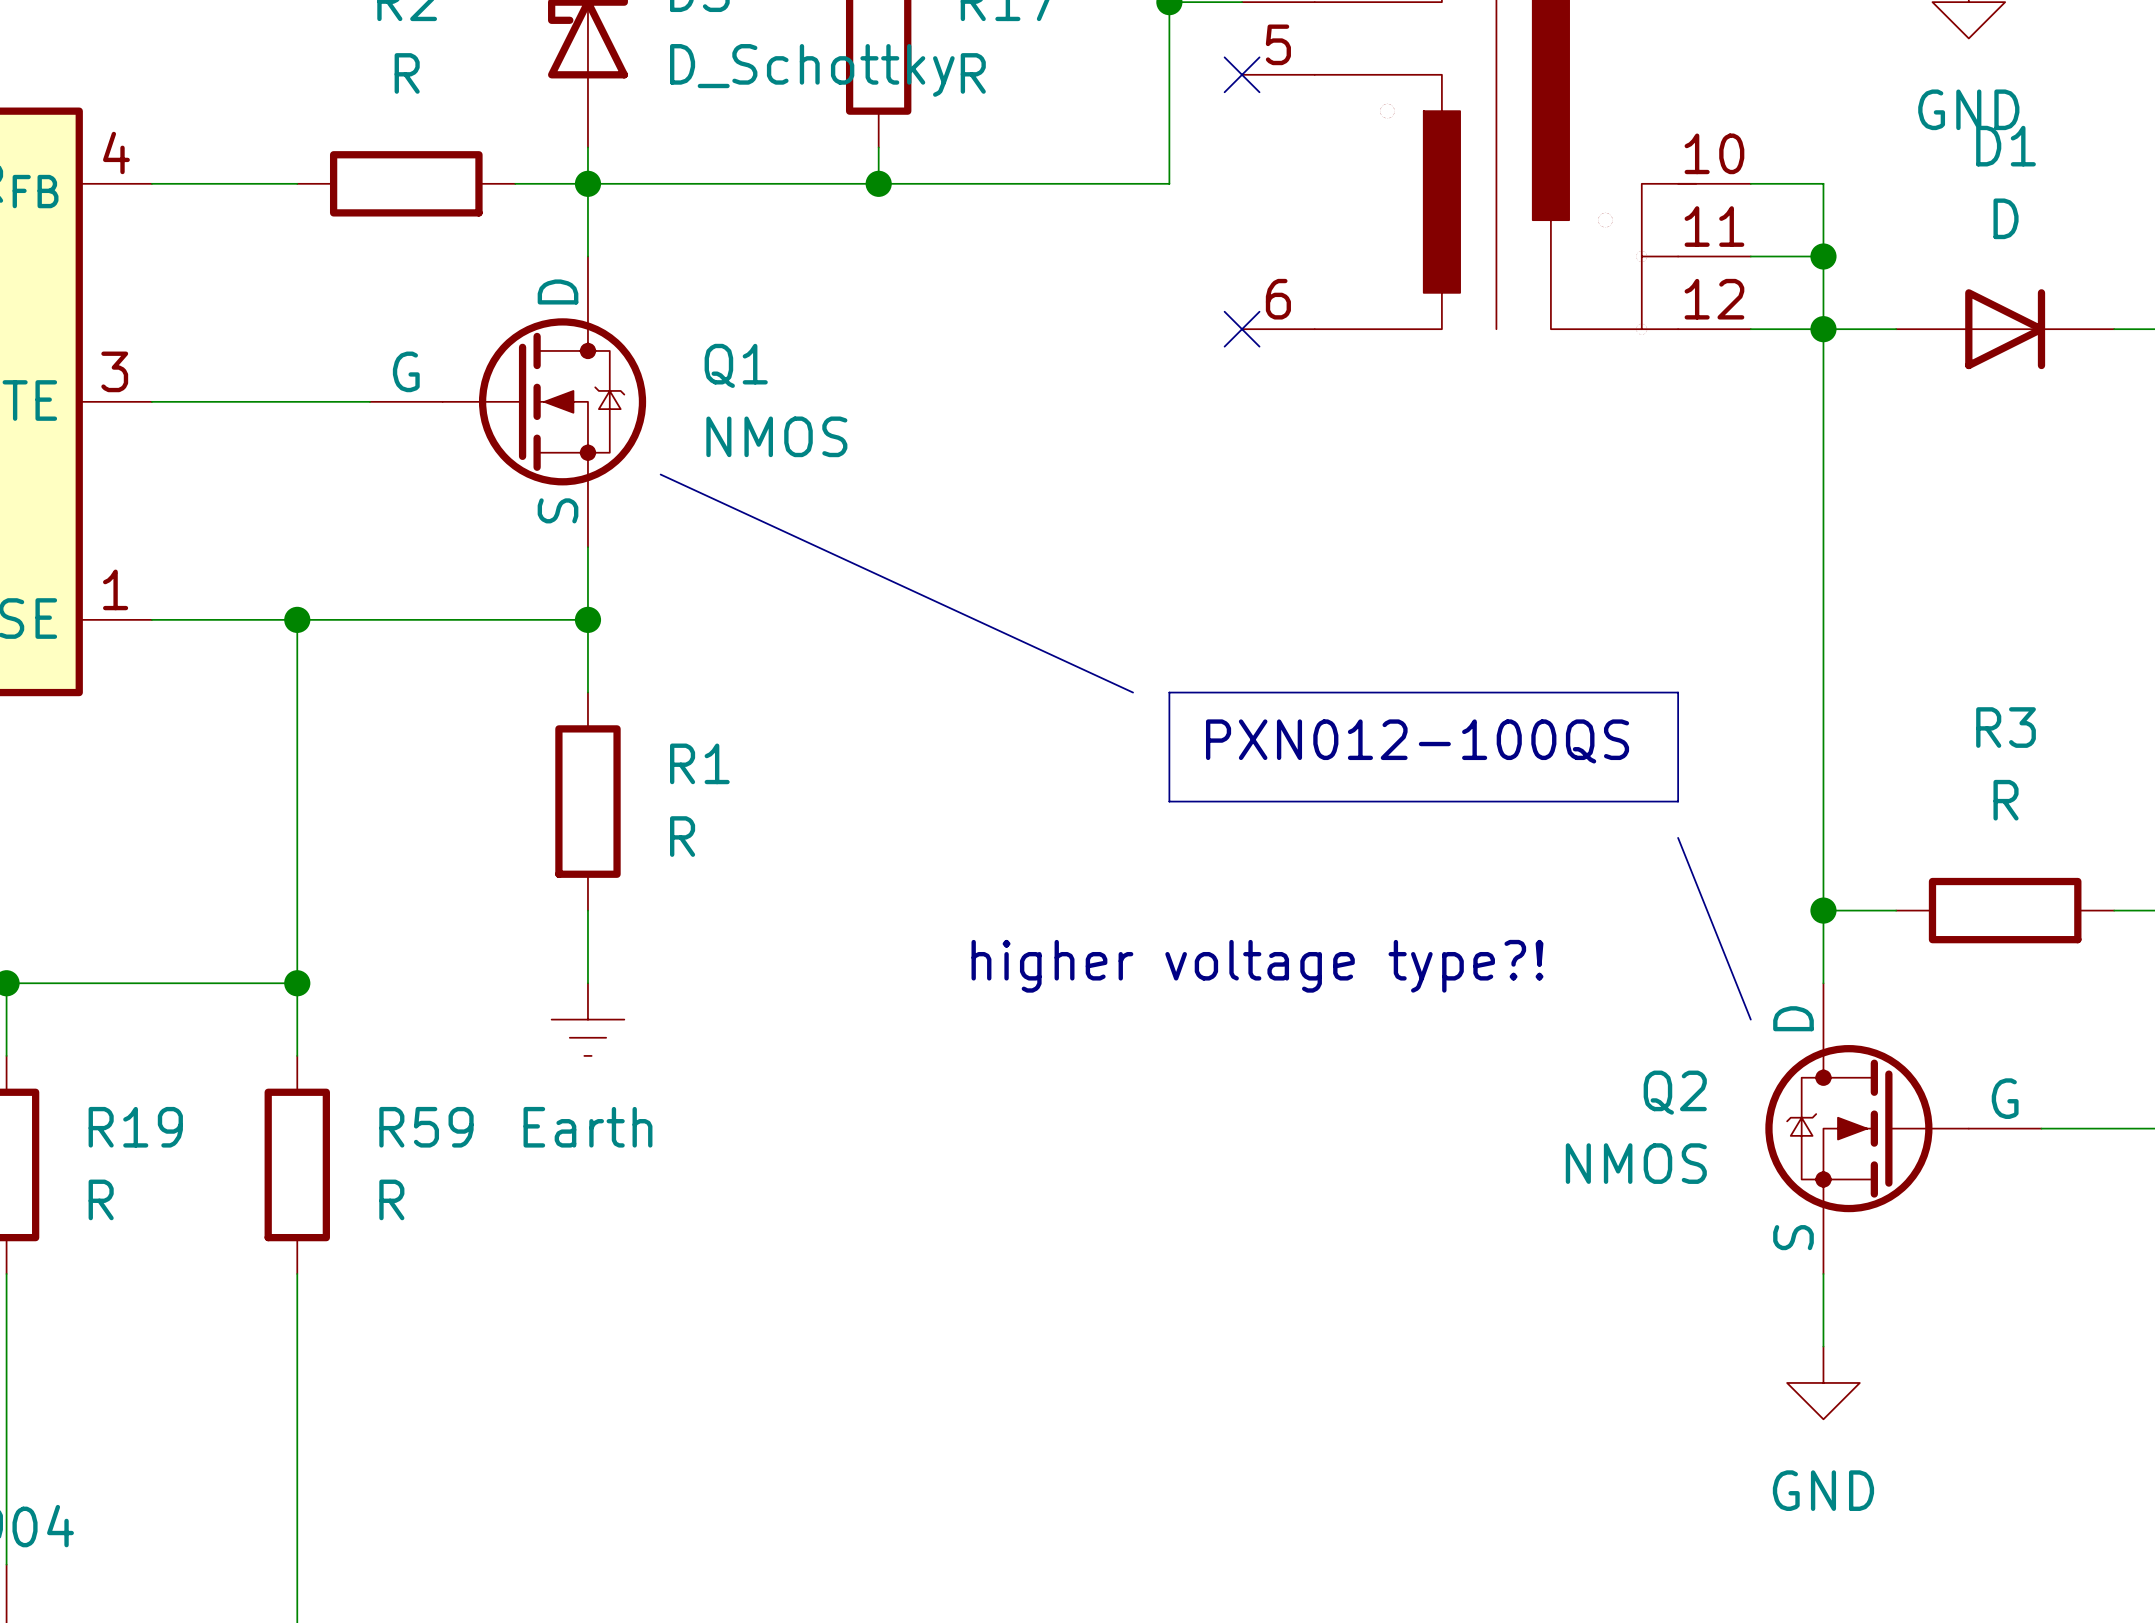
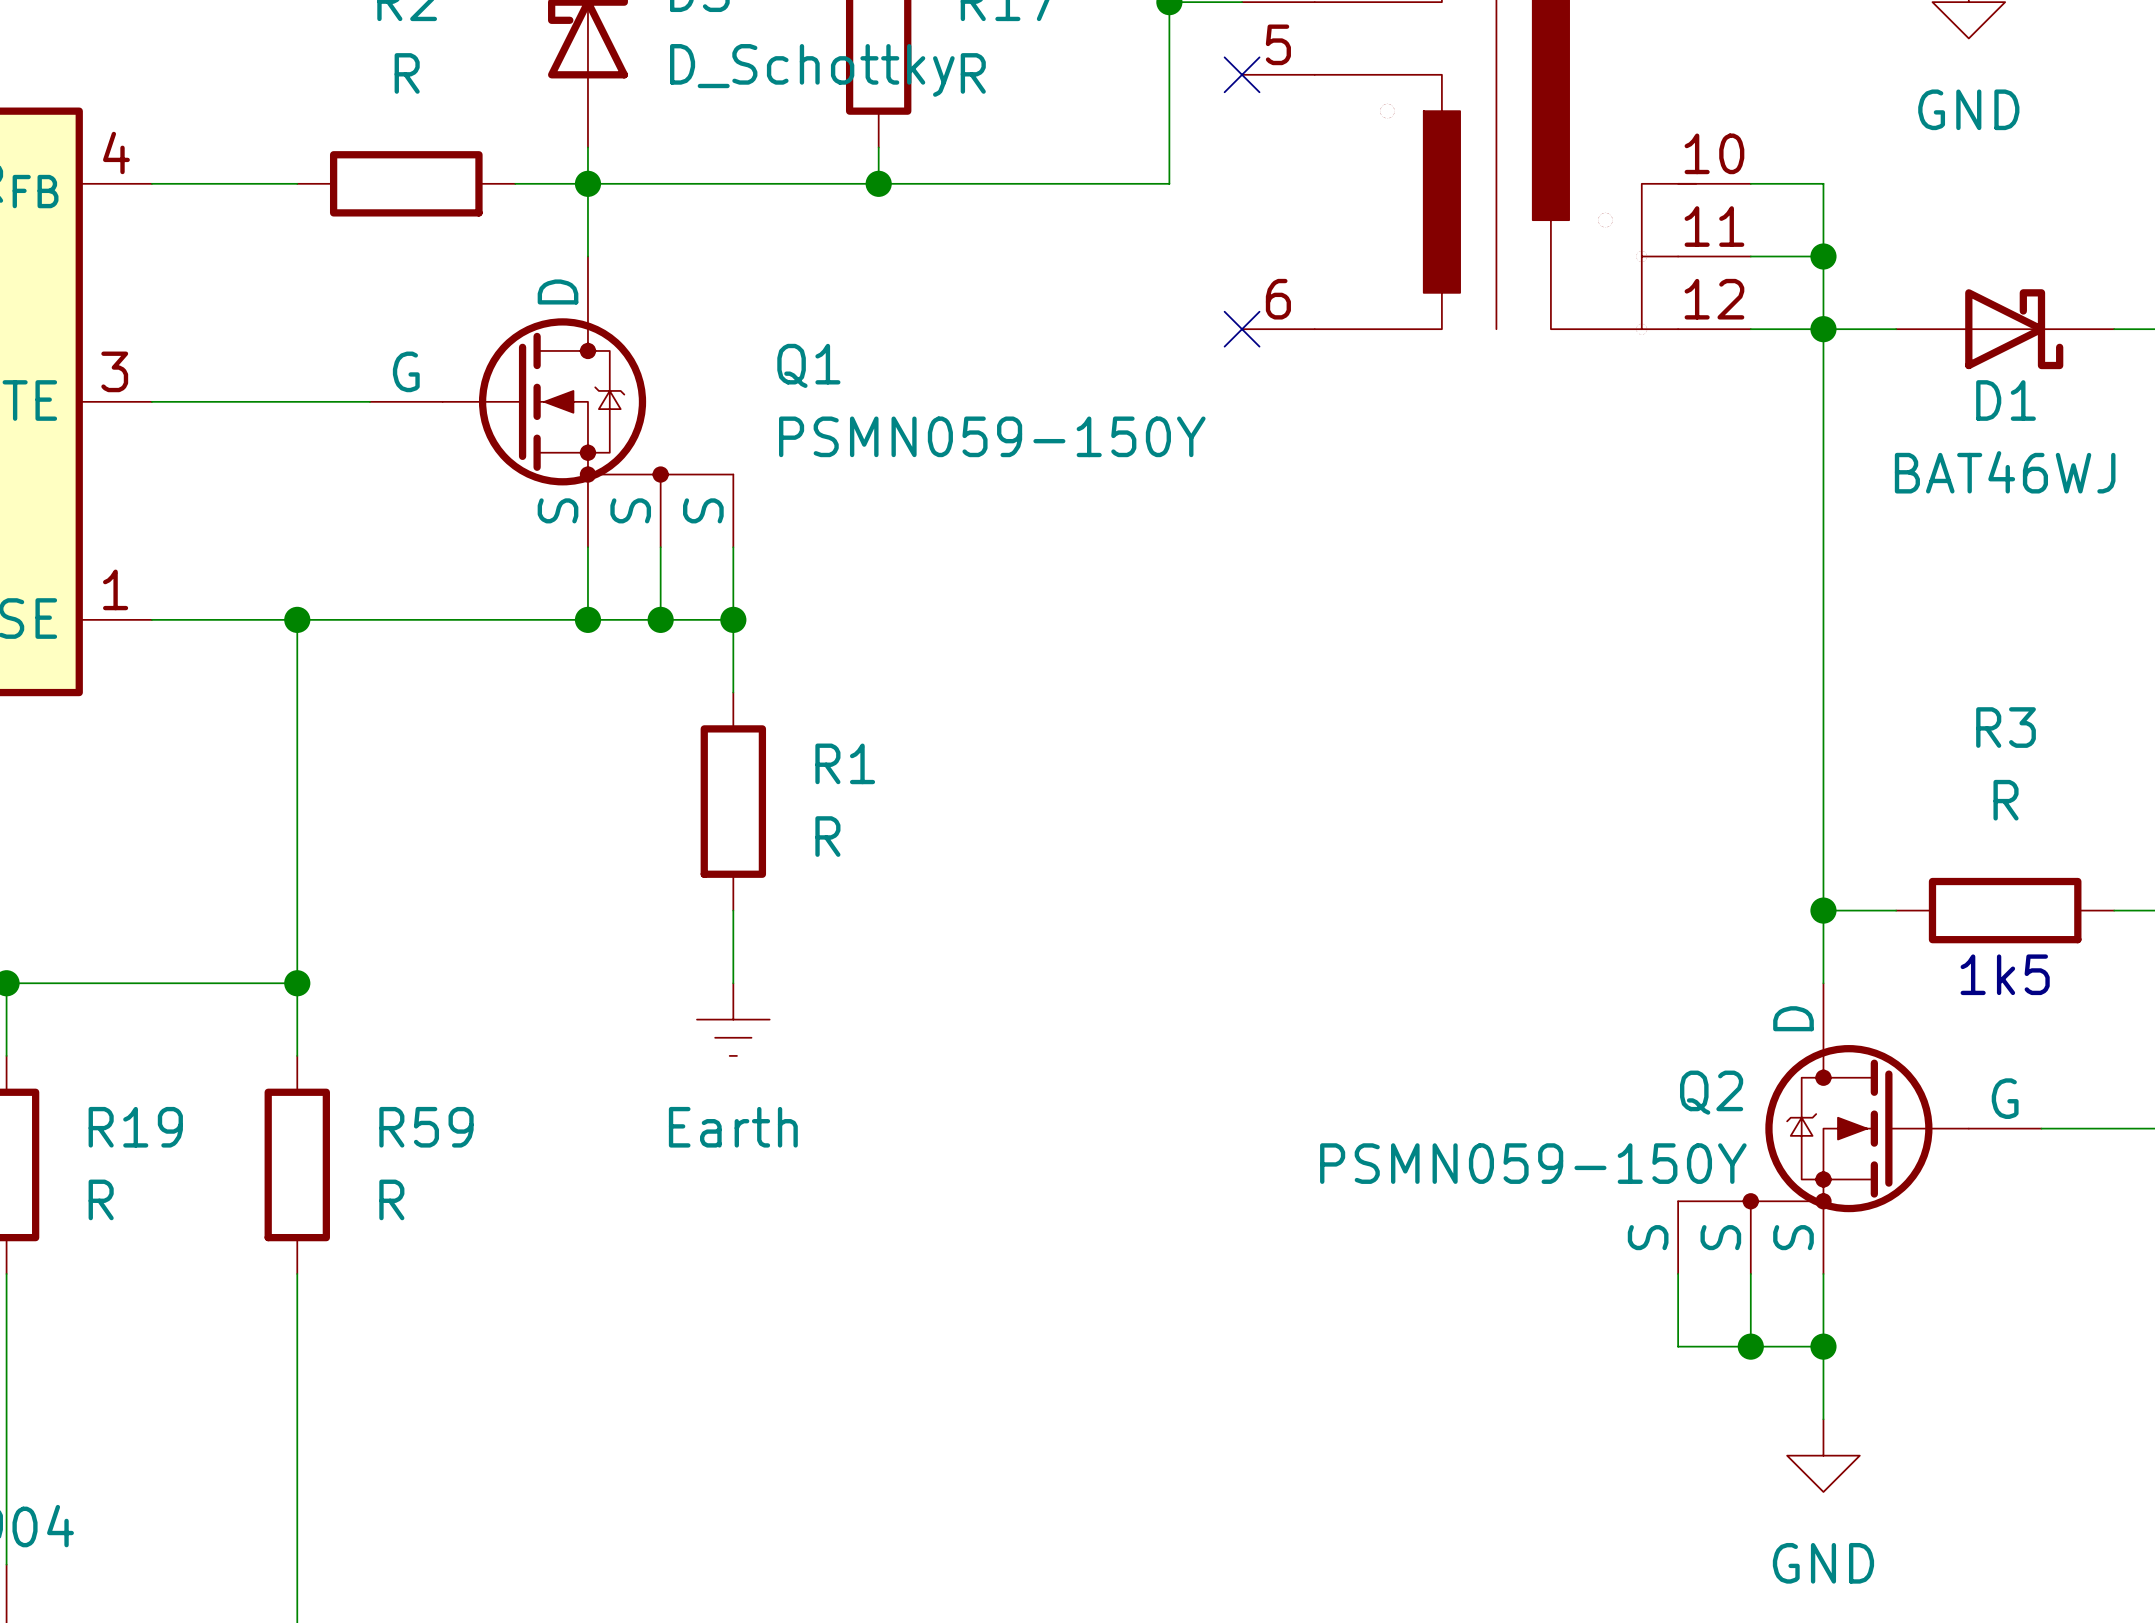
D1 name position: D1 (2006, 146) -> D1 (2006, 400)
D1 value: D (2006, 218) -> BAT46WJ (2005, 472)
Q1 symbol: [369, 256, 647, 548] -> [369, 256, 734, 548]
D1 symbol: [1896, 289, 2115, 370] -> [1896, 289, 2115, 370]
Q1 value: NMOS (776, 436) -> PSMN059-150Y (992, 436)
line: (660, 474) (1133, 692) -> none
wire: none -> (660, 547) (660, 619)
wire: none -> (733, 547) (733, 692)
wire: (587, 619) (587, 692) -> (587, 619) (733, 619)
junction: none -> (660, 619)
junction: none -> (733, 619)
line: (1169, 692) (1678, 692) (1678, 801) (1169, 801) (1169, 692) -> none
text: PXN012-100QS (1417, 741) -> none
R1 position: (587, 801) -> (733, 801)
line: (1678, 837) (1750, 1019) -> none
wire: (587, 910) (587, 983) -> (733, 910) (733, 983)
text: higher voltage type?! (1257, 966) -> none
text: none -> 1k5 (2005, 974)
Q2 symbol: [1765, 983, 2042, 1274] -> [1678, 983, 2042, 1274]
power symbol position: Earth (587, 1019) -> Earth (733, 1019)
Q2 name position: Q2 (1675, 1092) -> Q2 (1711, 1092)
Q2 value: NMOS (1636, 1163) -> PSMN059-150Y (1533, 1163)
wire: none -> (1678, 1273) (1678, 1346) (1823, 1346) (1823, 1419)
wire: none -> (1750, 1273) (1750, 1346)
junction: none -> (1750, 1346)
junction: none -> (1823, 1346)
power symbol position: GND (1823, 1382) -> GND (1823, 1455)

